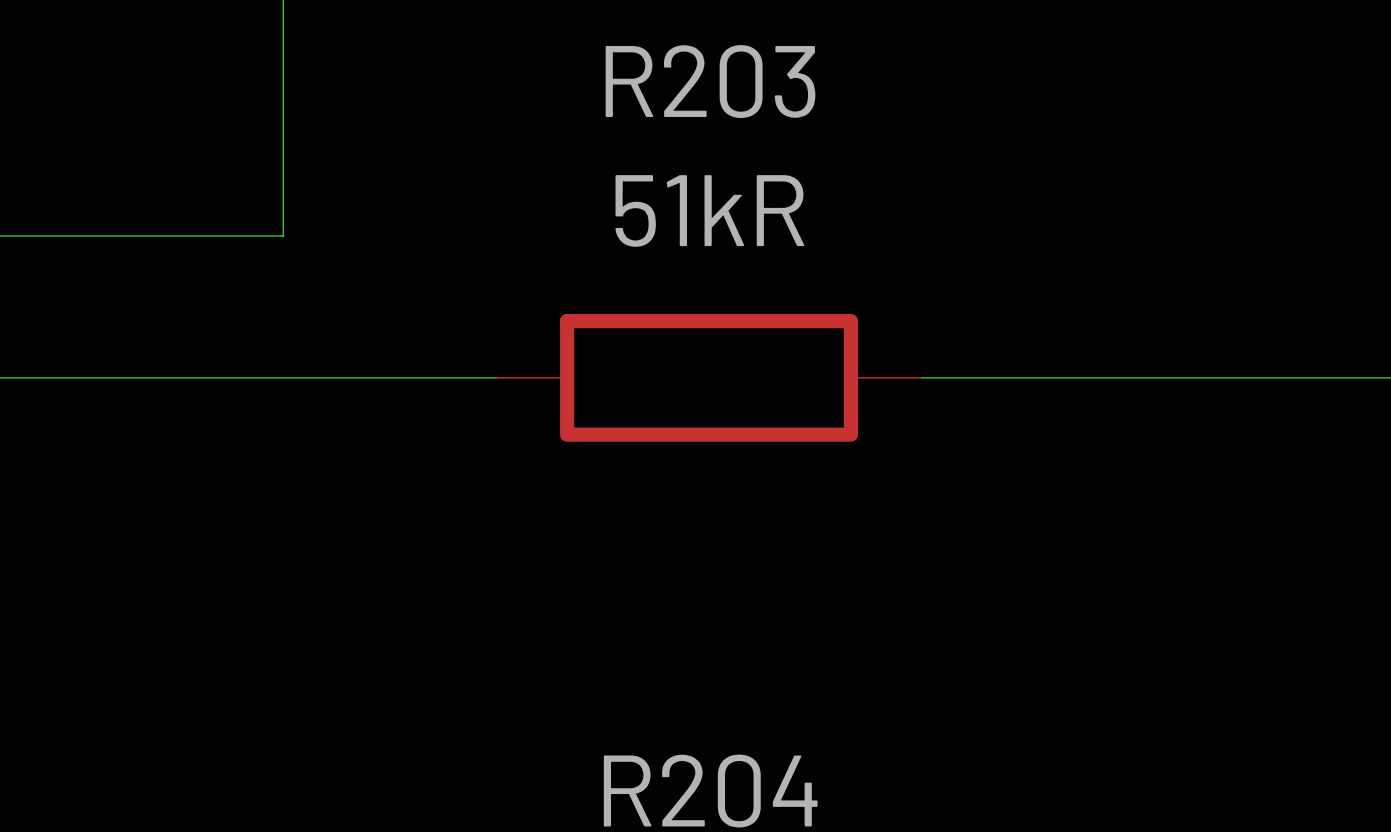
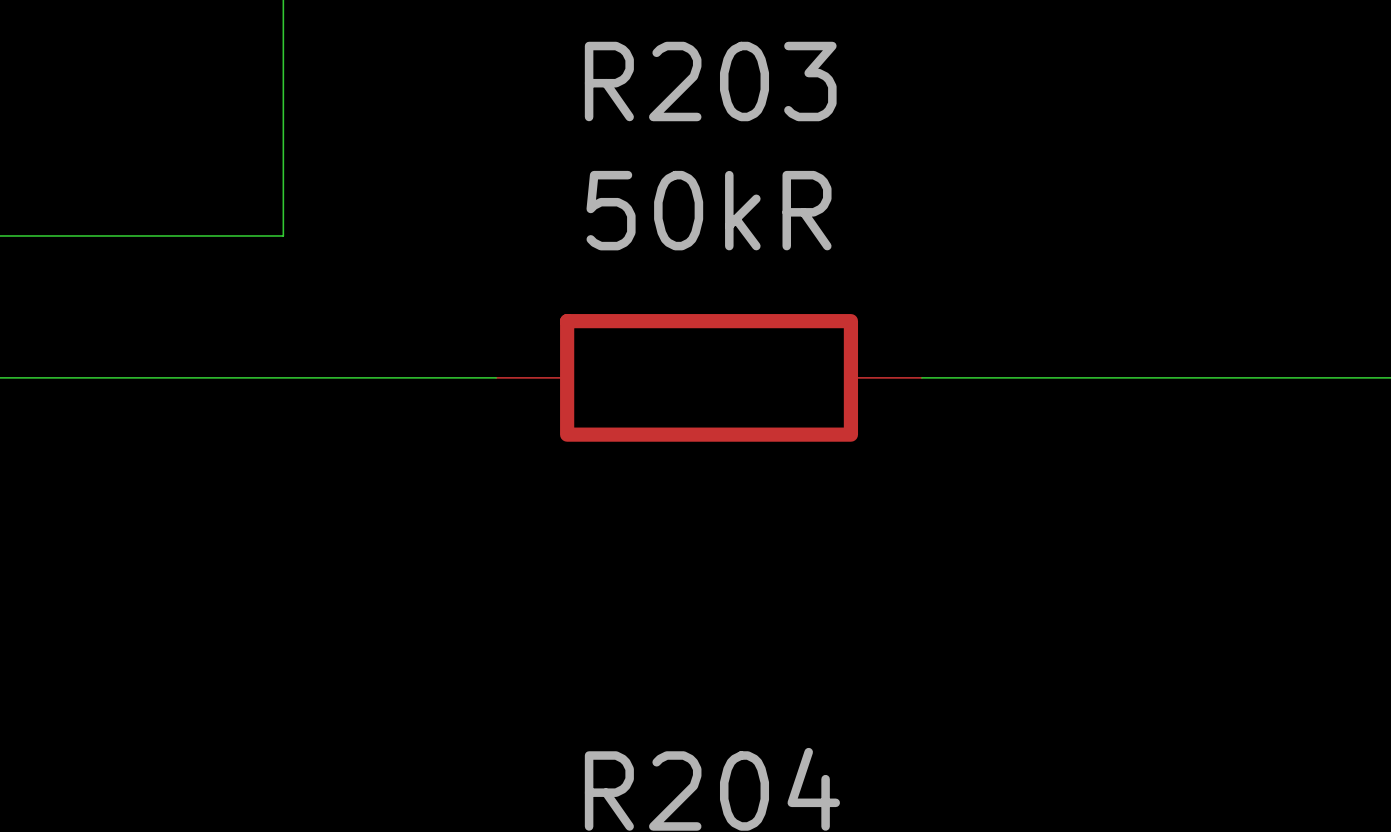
R203 value: 51kR (709, 210) -> 50kR (709, 210)

